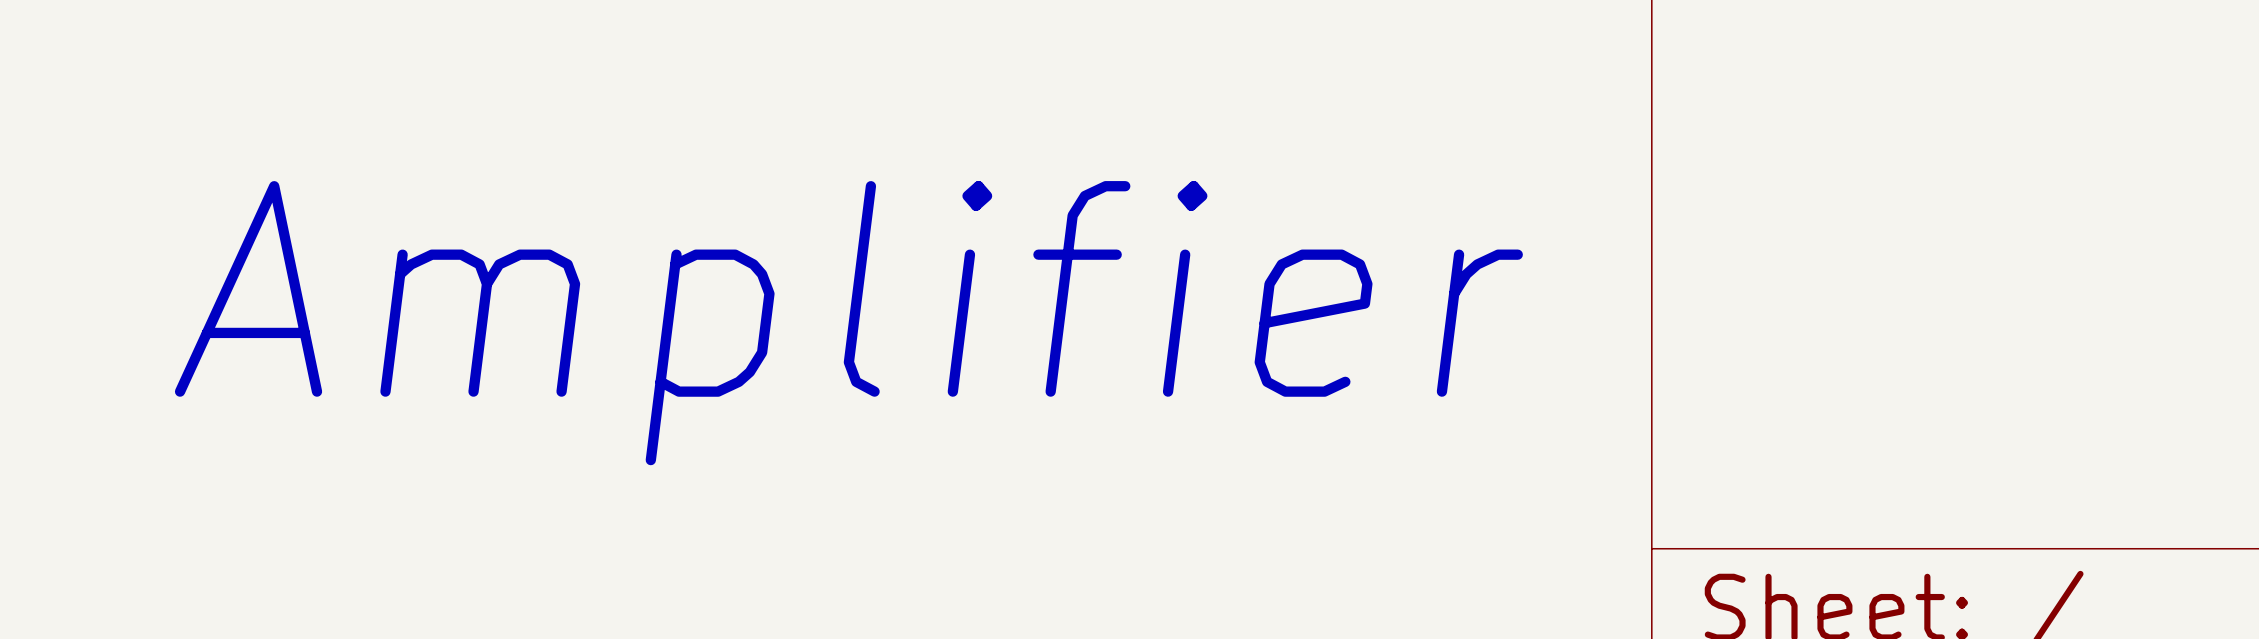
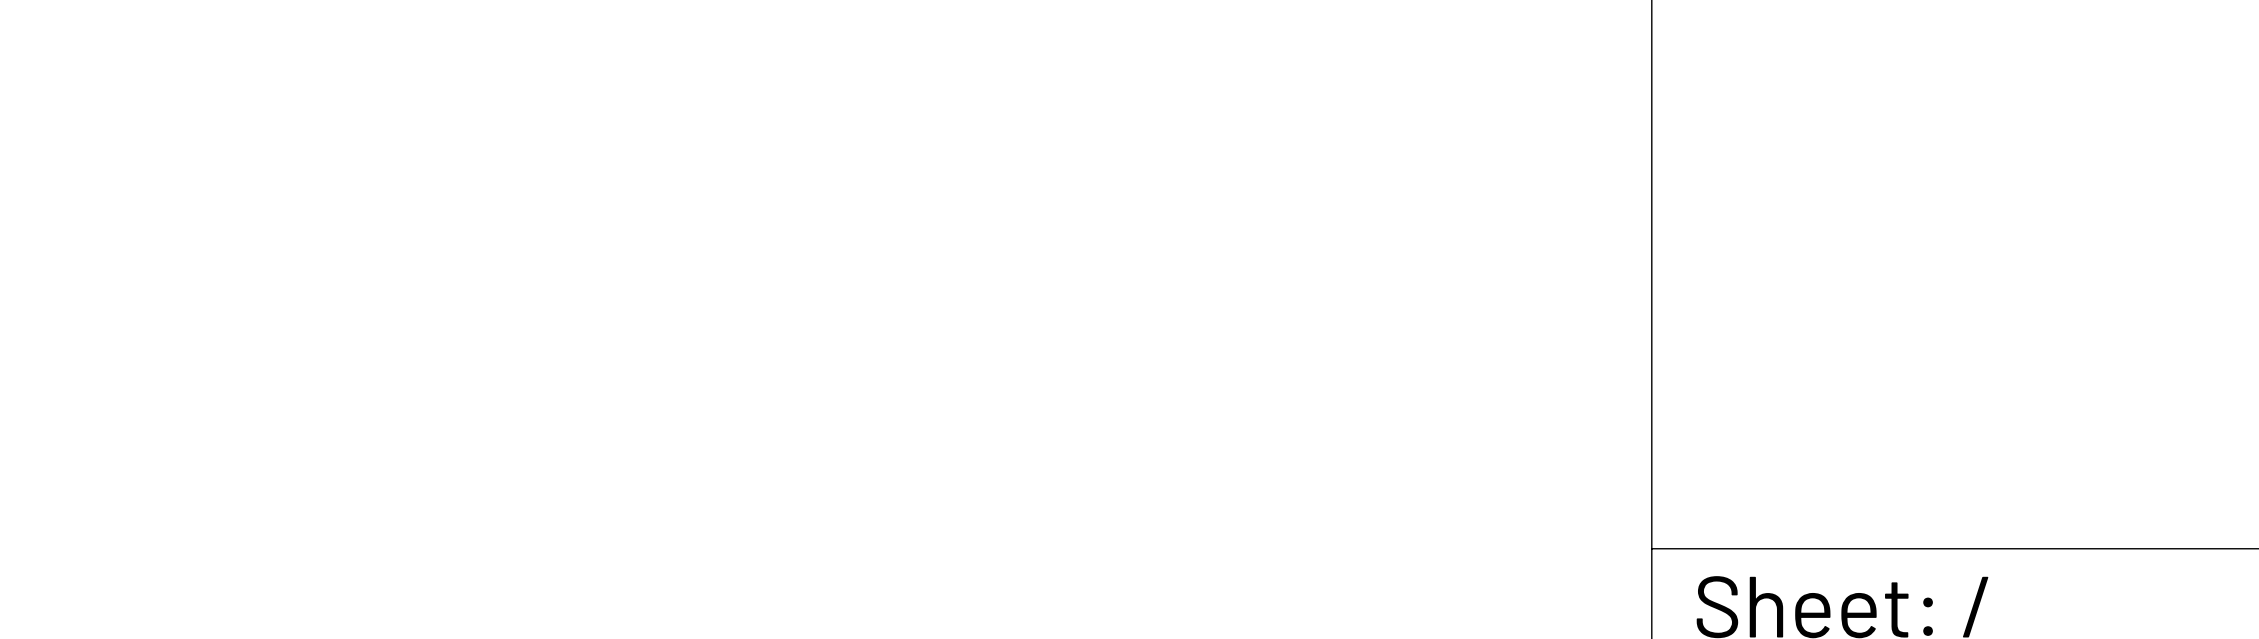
text: Amplifier (848, 323) -> none

